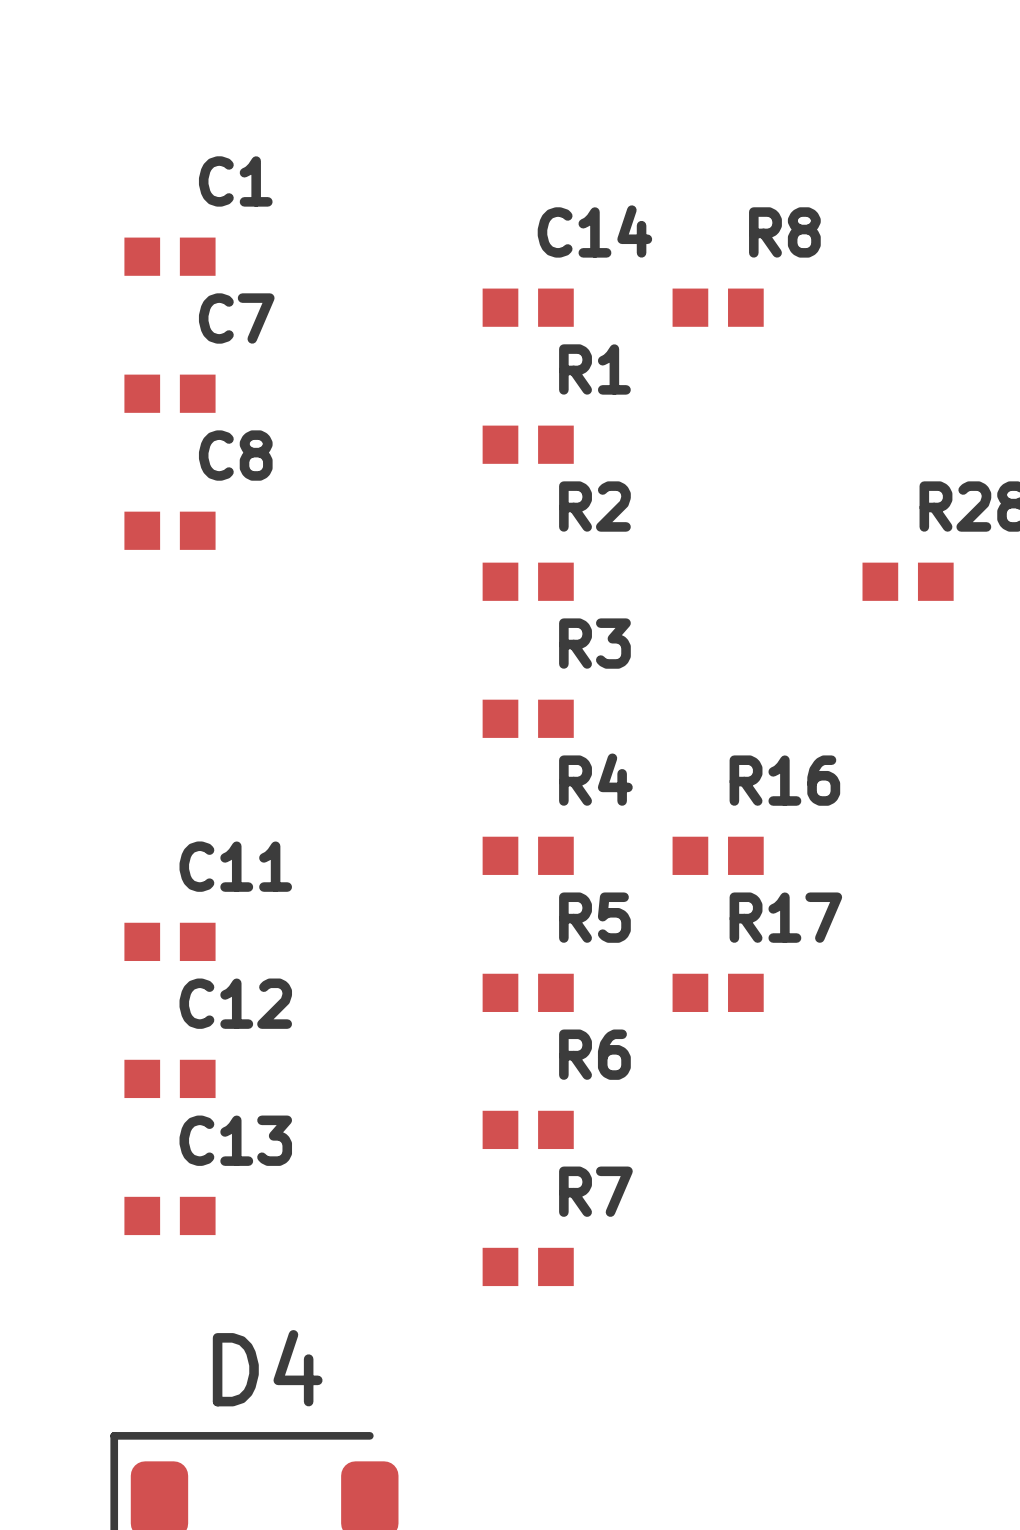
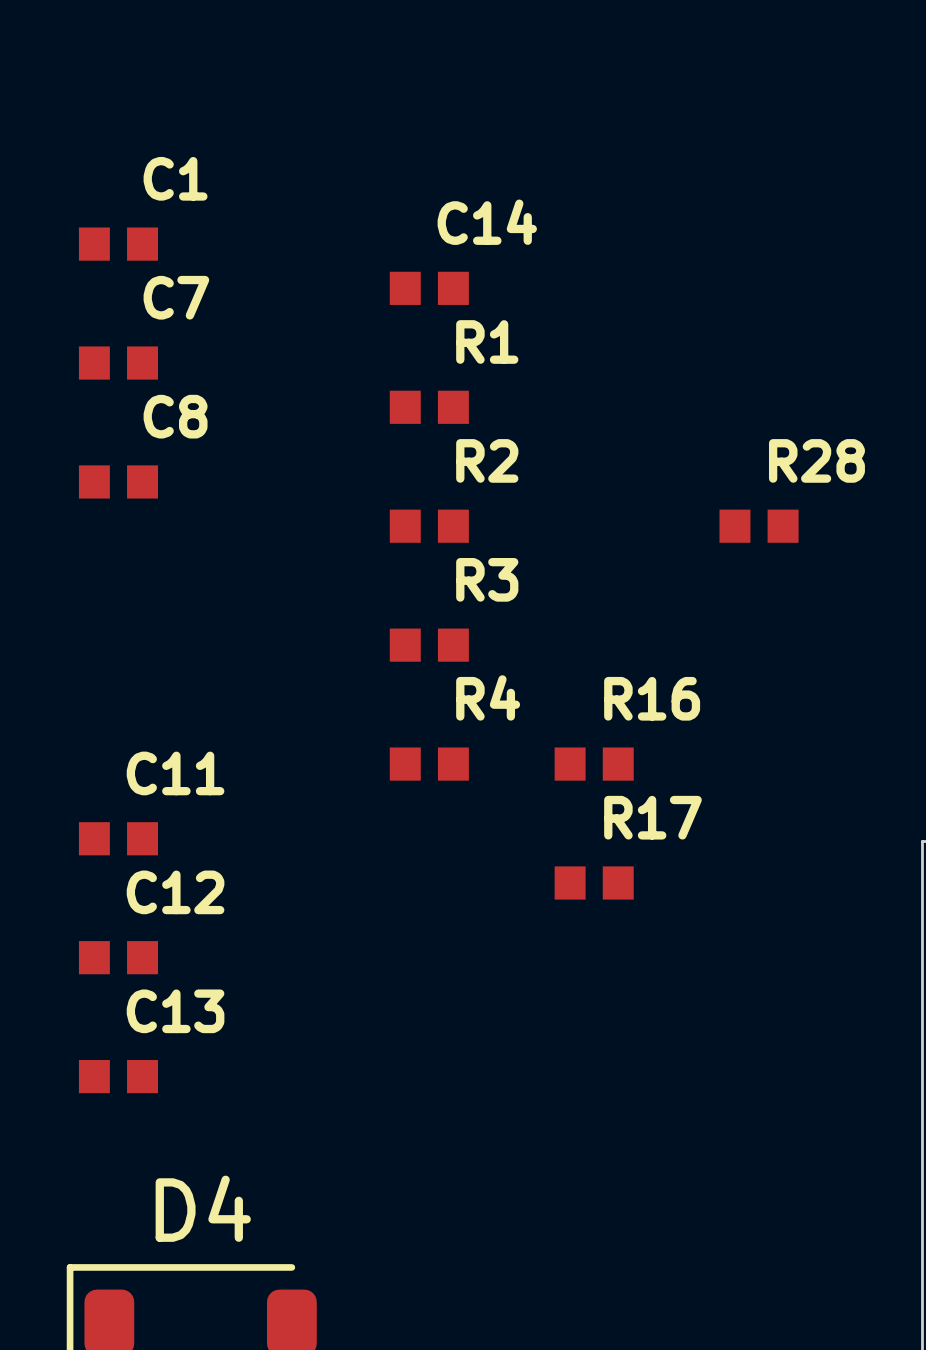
R8: (718, 307) -> none
R5: (528, 992) -> none
R6: (528, 1129) -> none
R7: (528, 1266) -> none

